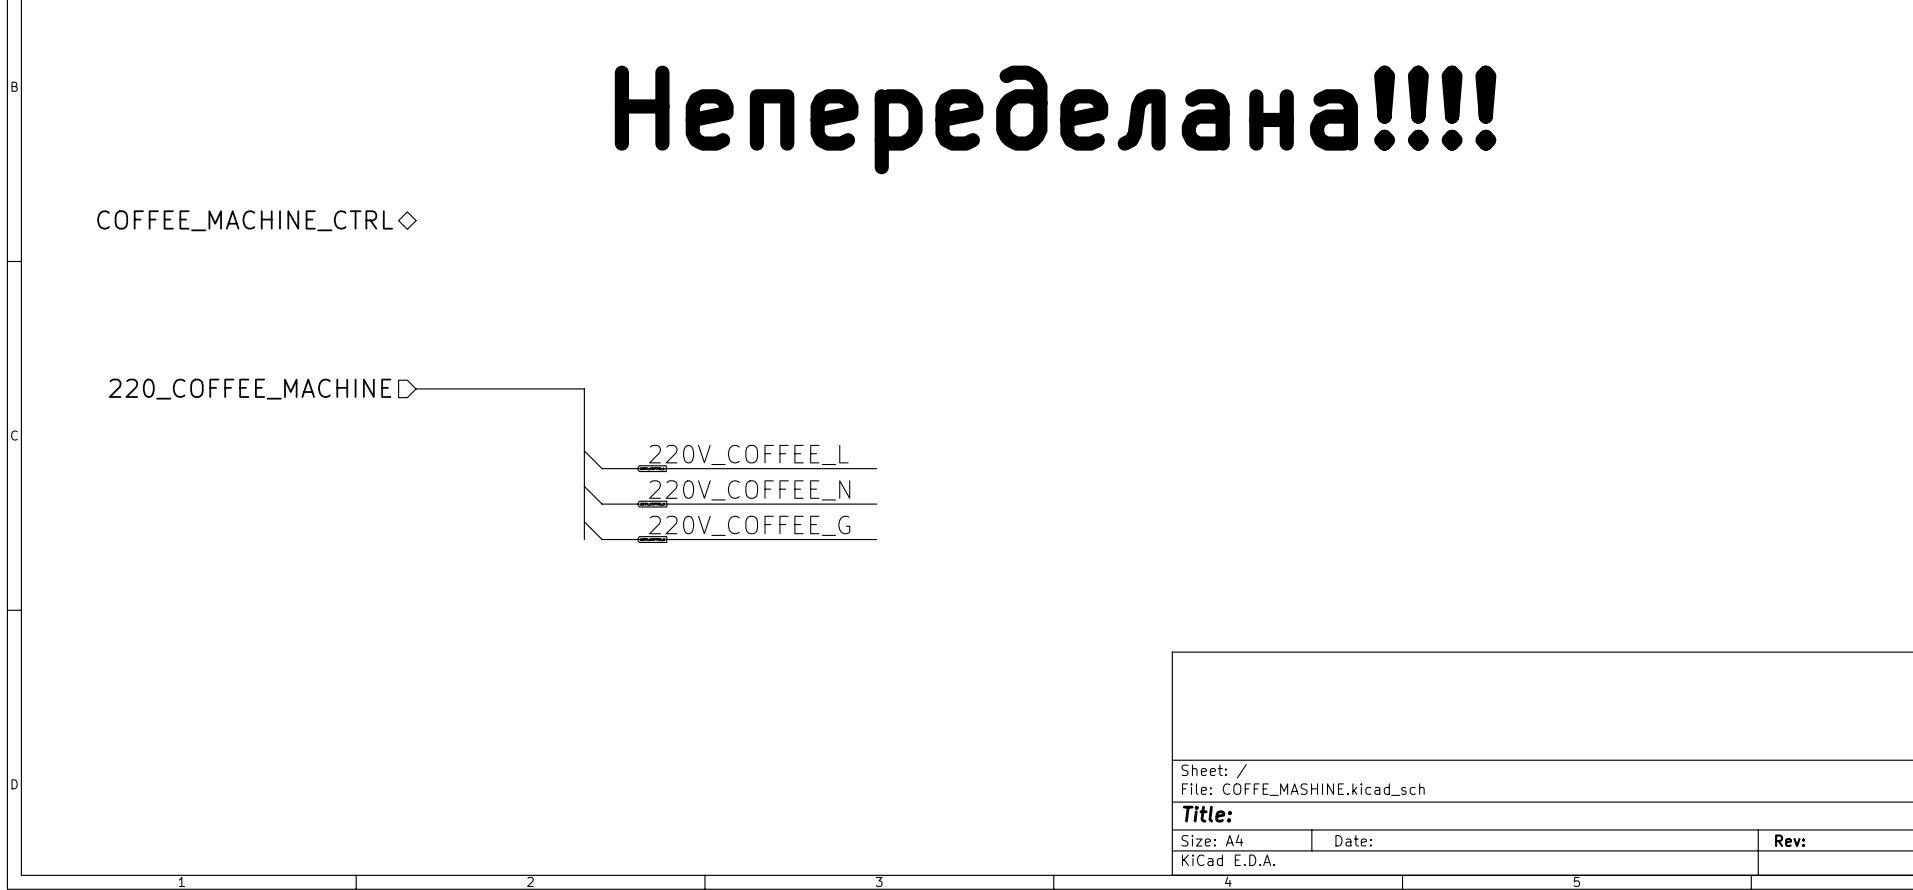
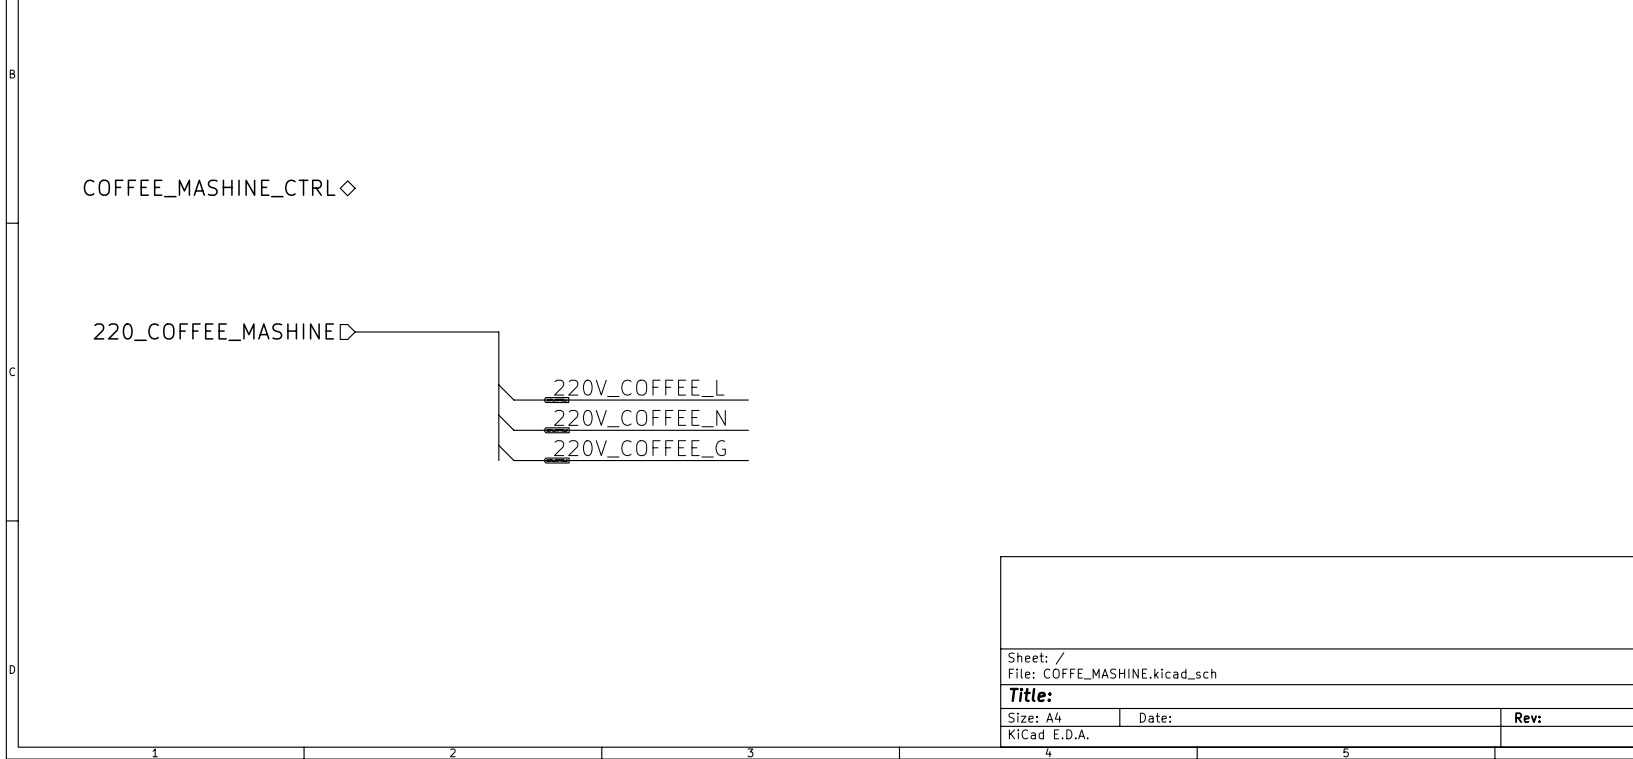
text: Непеределана!!!! (1055, 119) -> none
hierarchical label: COFFEE_MACHINE_CTRL (245, 220) -> COFFEE_MASHINE_CTRL (209, 188)
hierarchical label: 220_COFFEE_MACHINE (250, 389) -> 220_COFFEE_MASHINE (213, 332)

